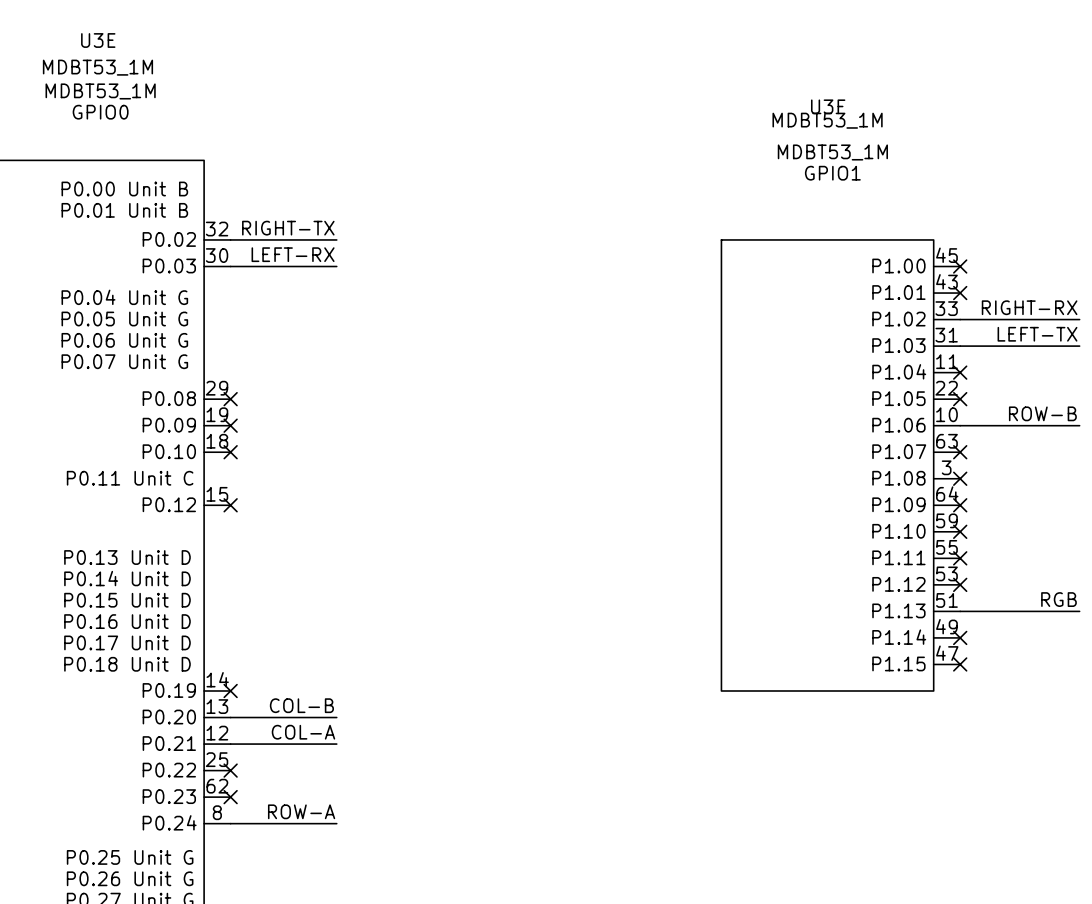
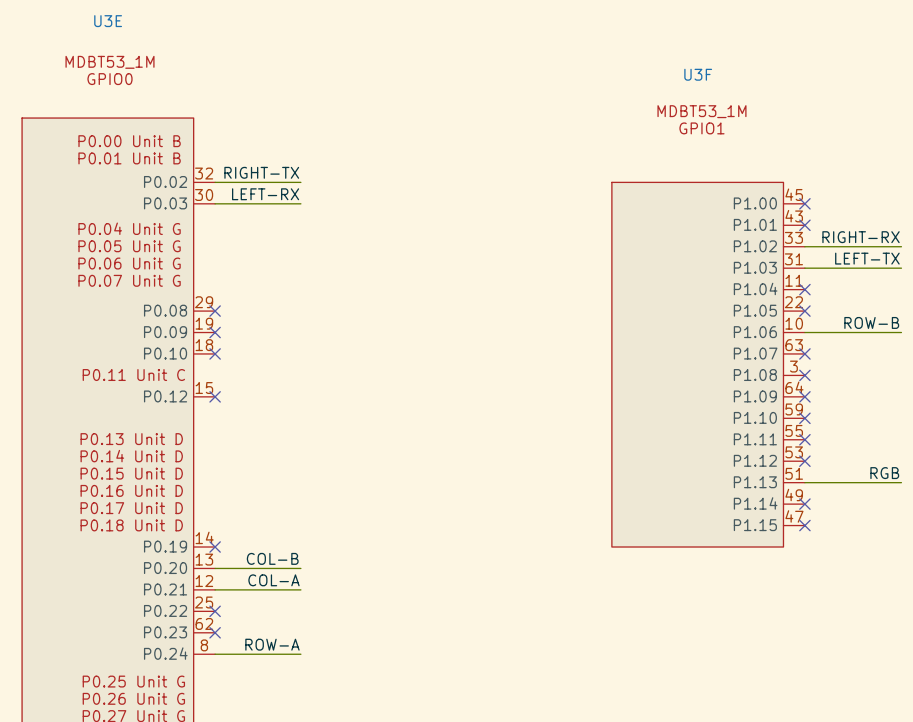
U3E value: MDBT53_1M (97, 67) -> none
U3F value: MDBT53_1M (827, 120) -> none

